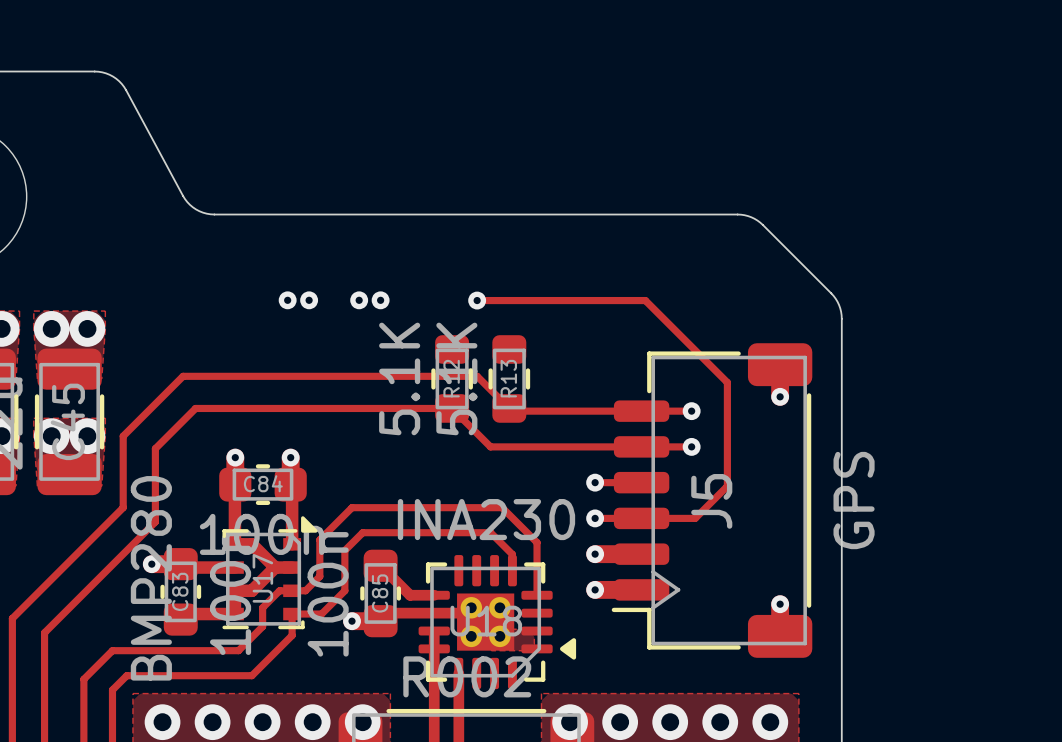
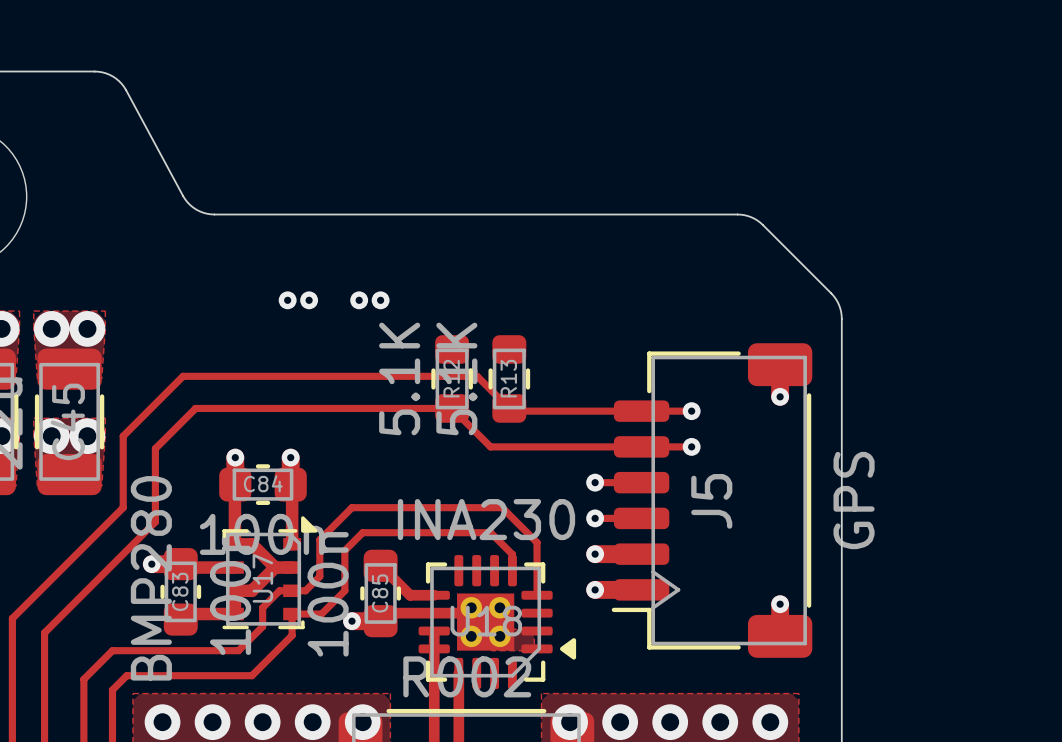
track: (477, 300) (645, 300) (727, 382) (727, 486) (695, 518) (641, 518) -> none
via: (477, 300) -> none

